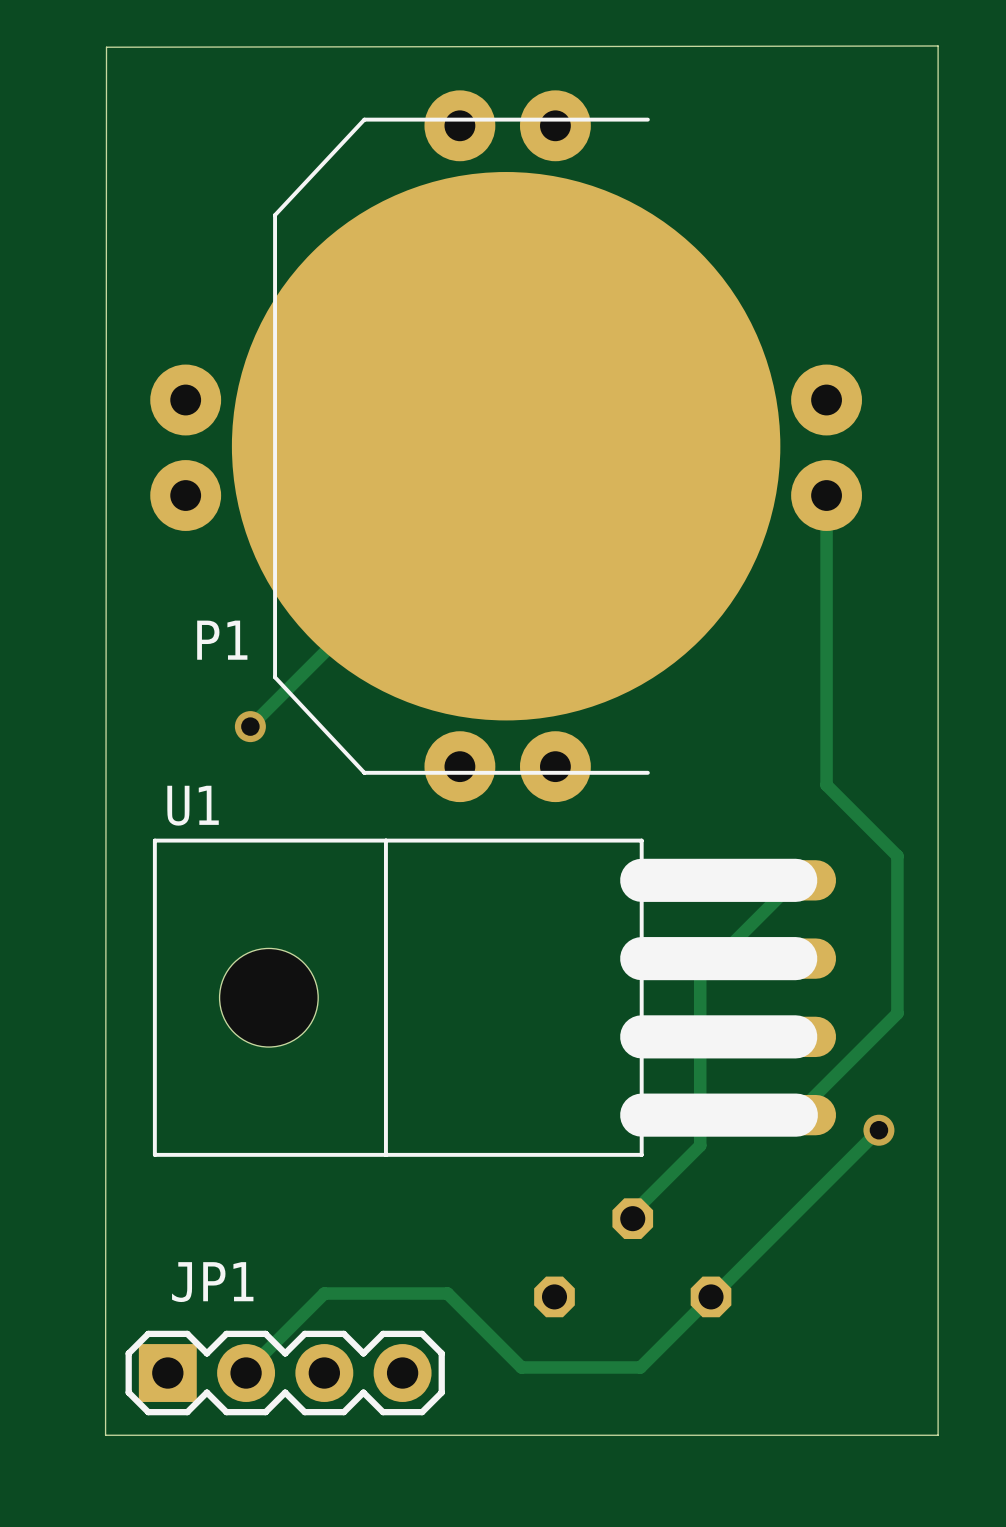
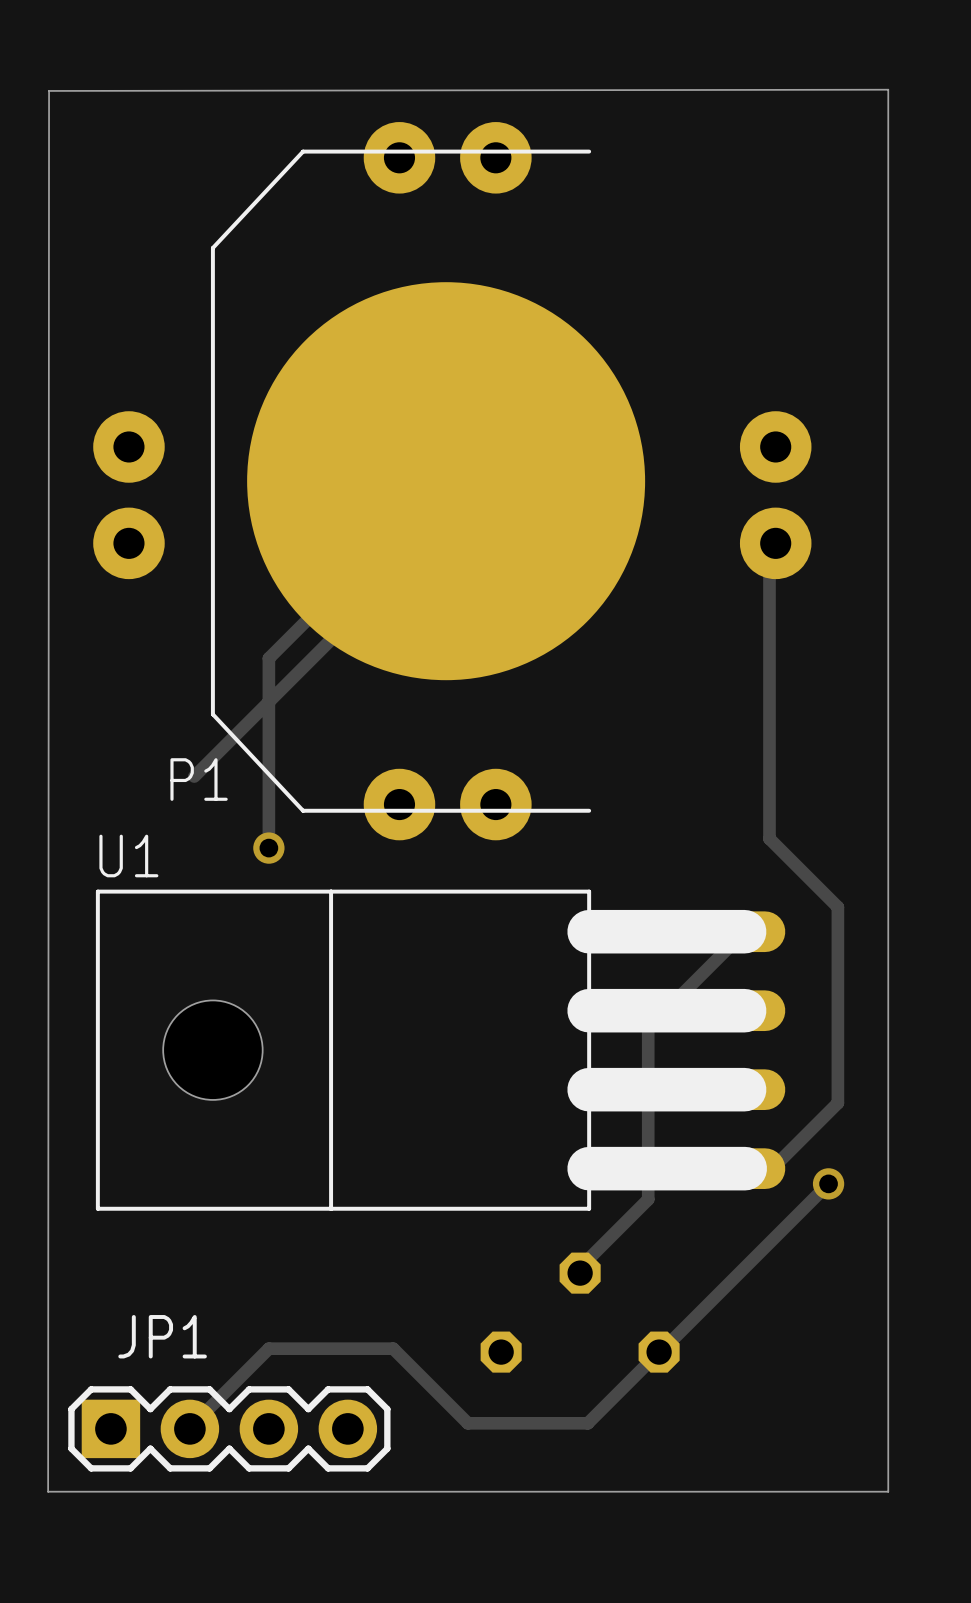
P1 footprint: [231, 90, 781, 803] -> [210, 122, 646, 841]
track: none -> (446, 481) (268, 658) (268, 848)
track: (826, 495) (826, 785) (897, 856) (897, 1013) (796, 1114) -> (769, 530) (769, 838) (837, 907) (837, 1103) (772, 1168) (744, 1168)
P1 name position: P1 (222, 640) -> P1 (199, 779)
via position: (250, 726) -> (268, 848)

